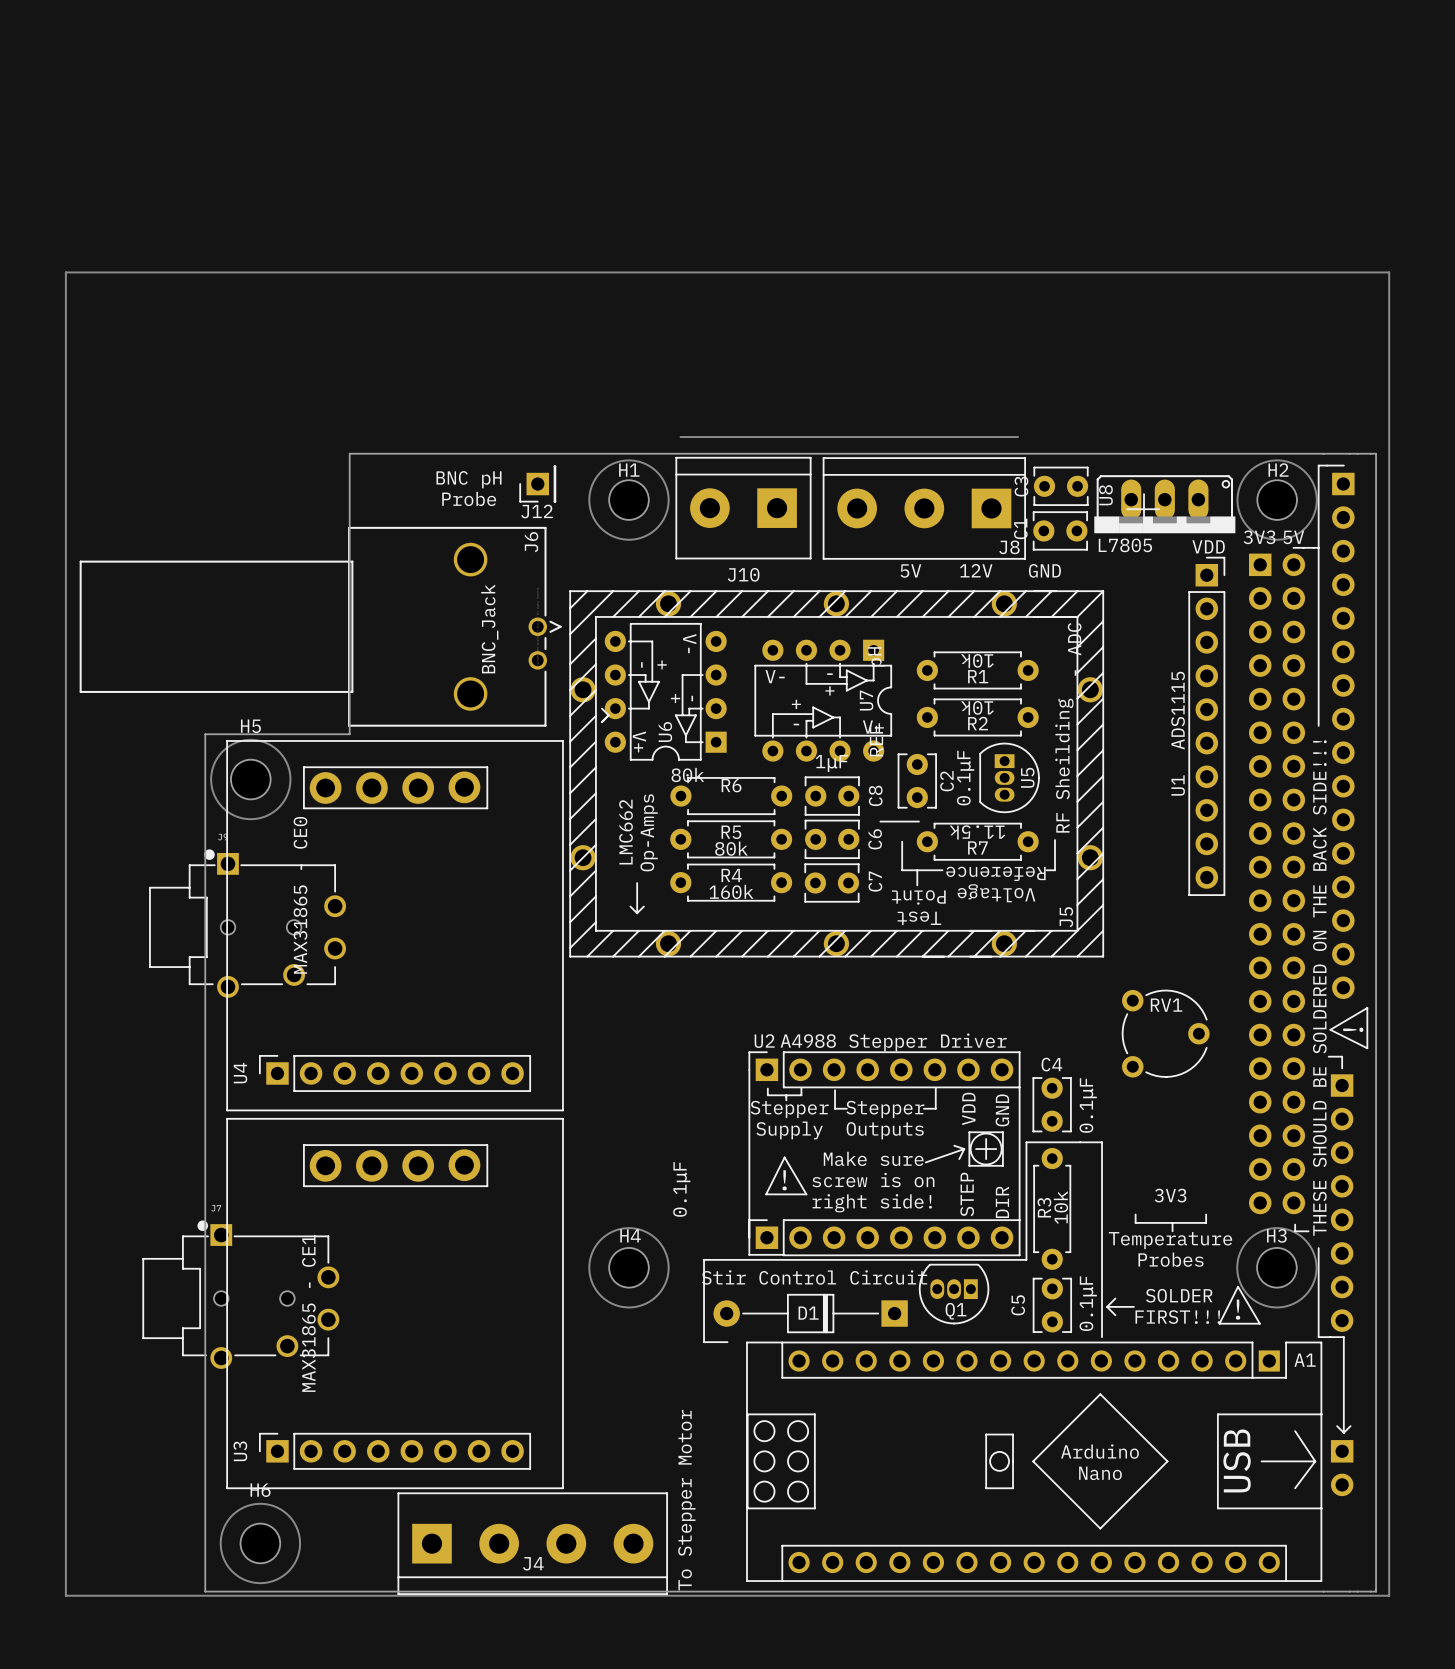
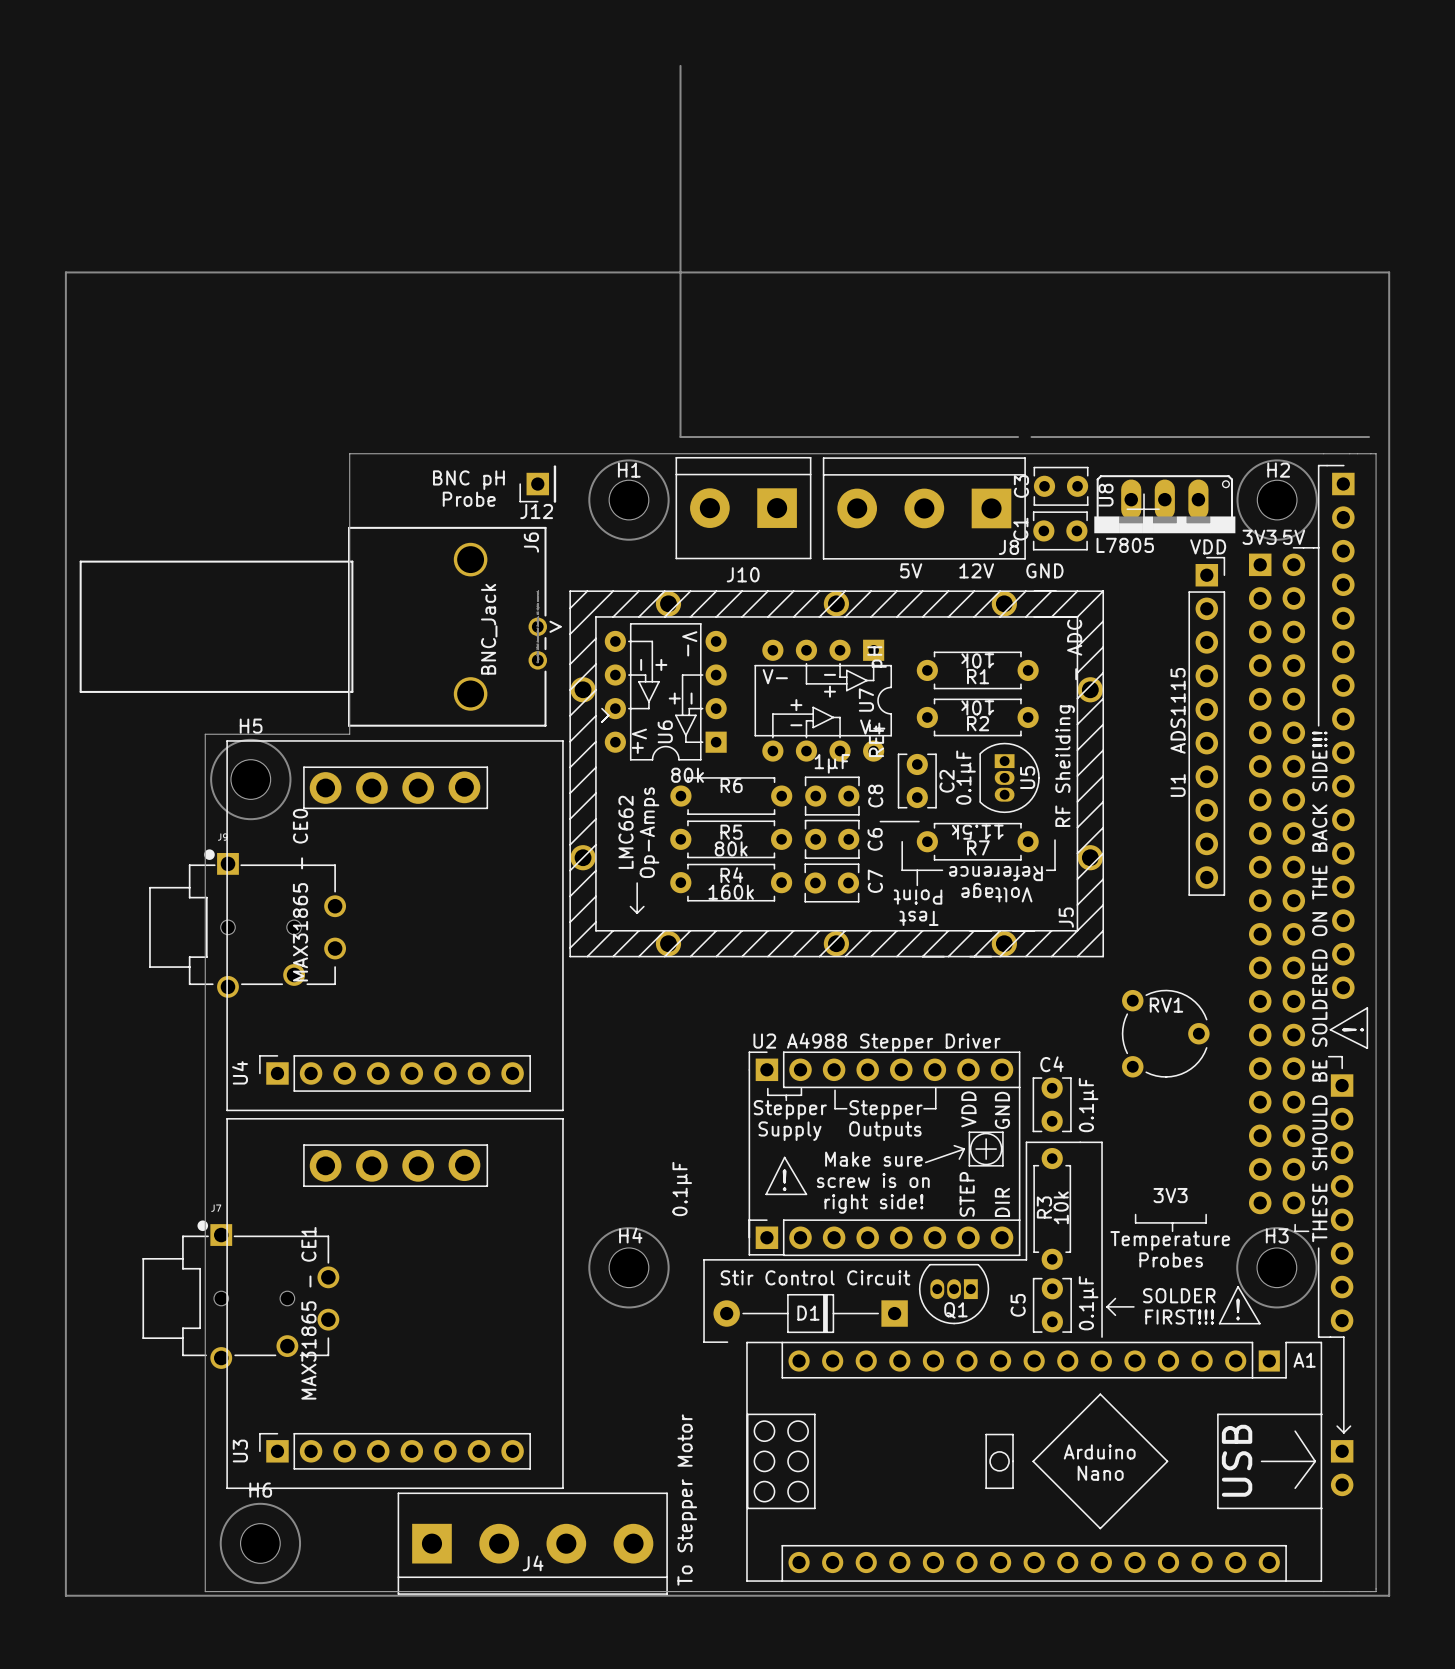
line: none -> (680, 65) (680, 437)
line: none -> (1031, 437) (1369, 437)

